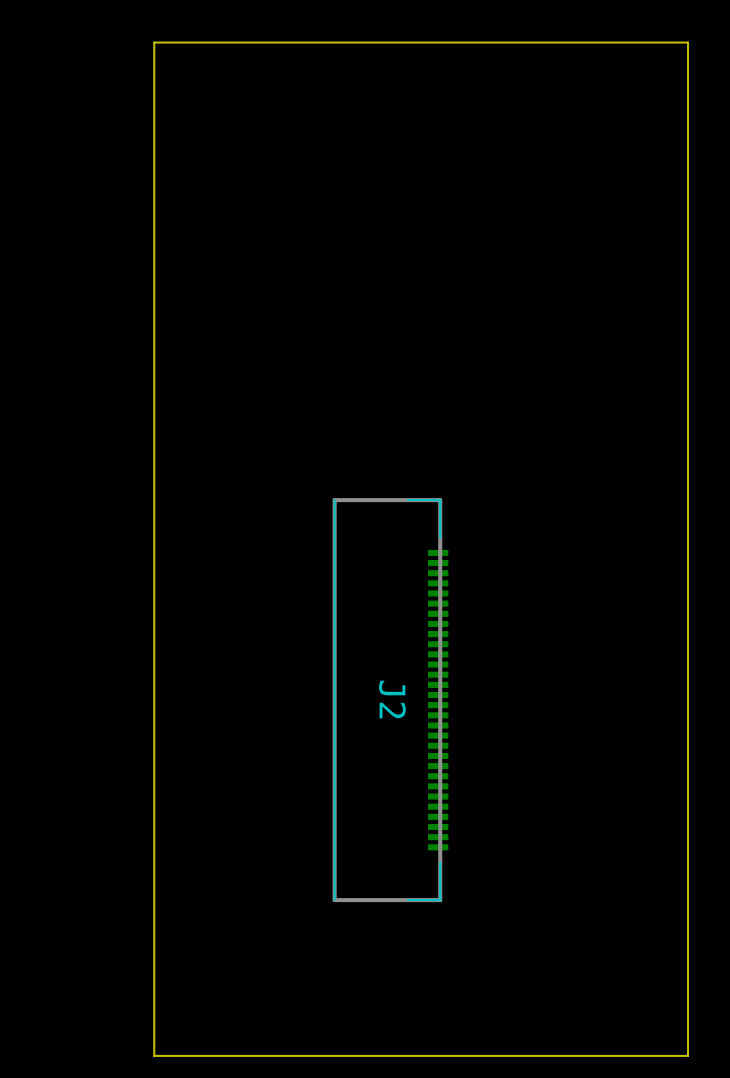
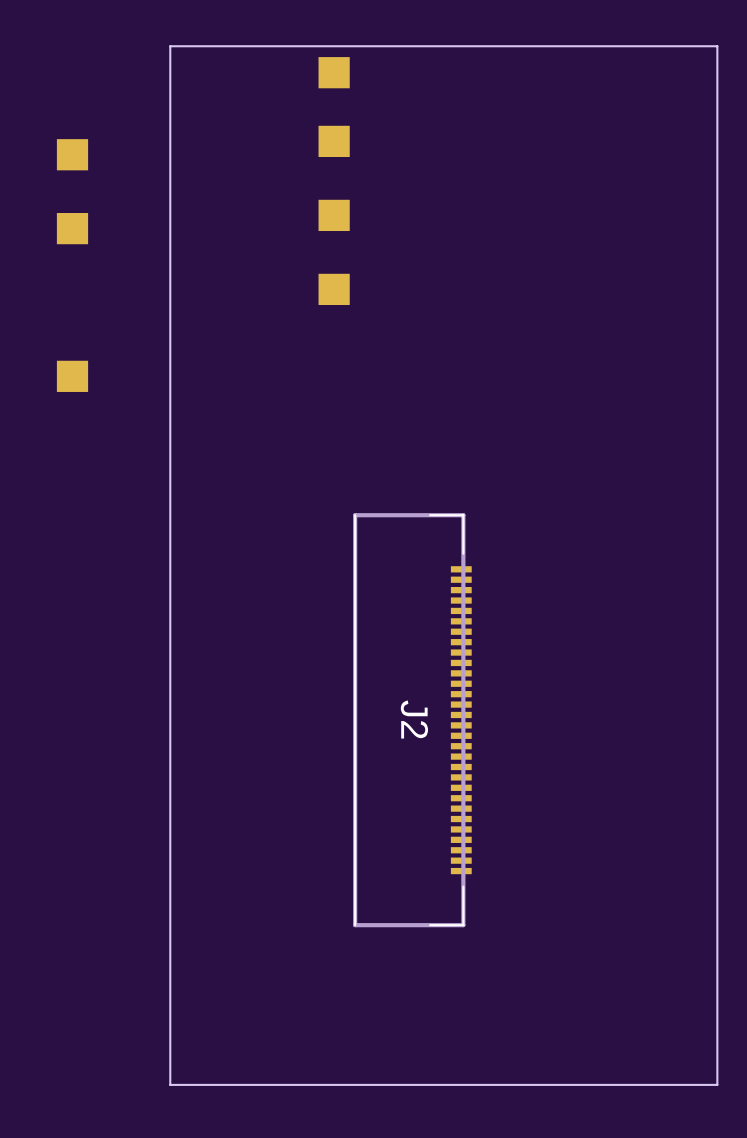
part: none -> (334, 72)
part: none -> (334, 141)
part: none -> (72, 154)
part: none -> (334, 215)
part: none -> (72, 228)
part: none -> (334, 289)
part: none -> (72, 376)

